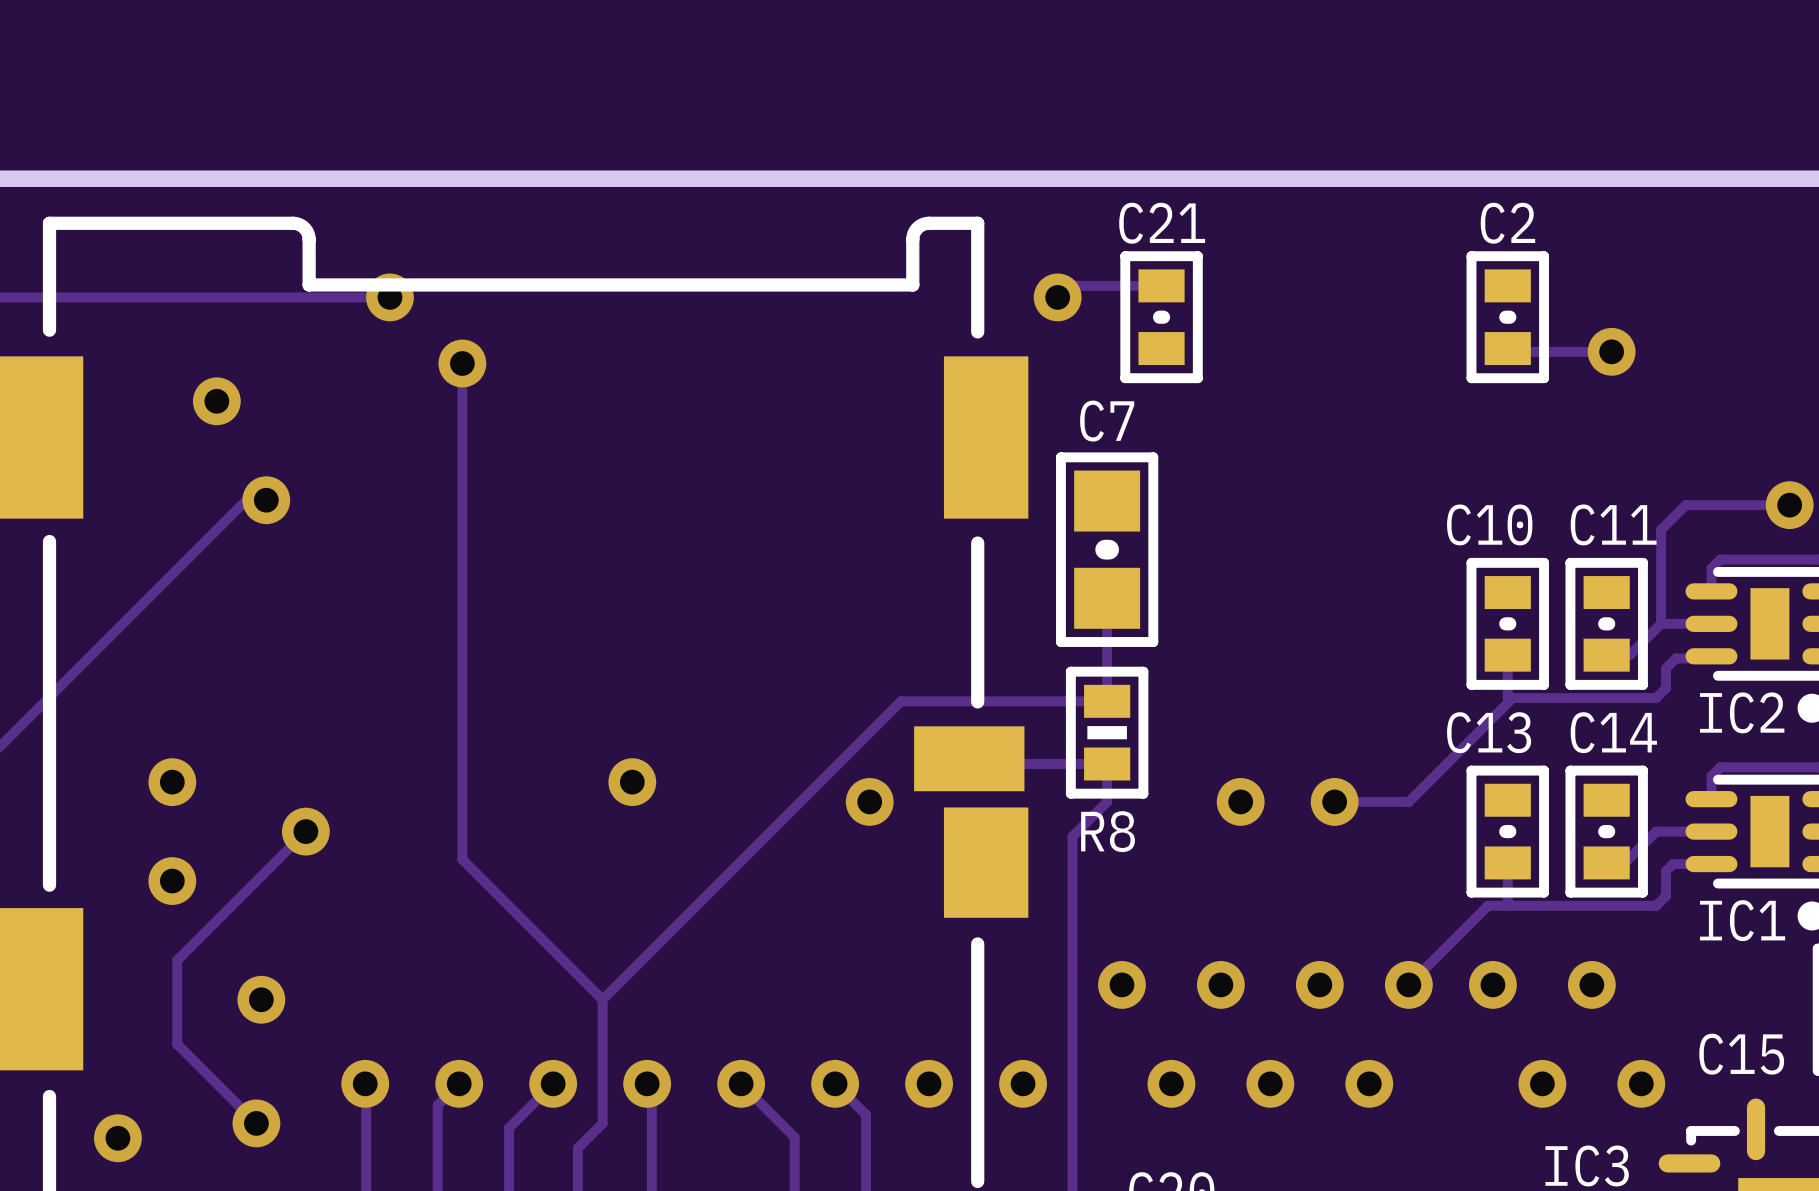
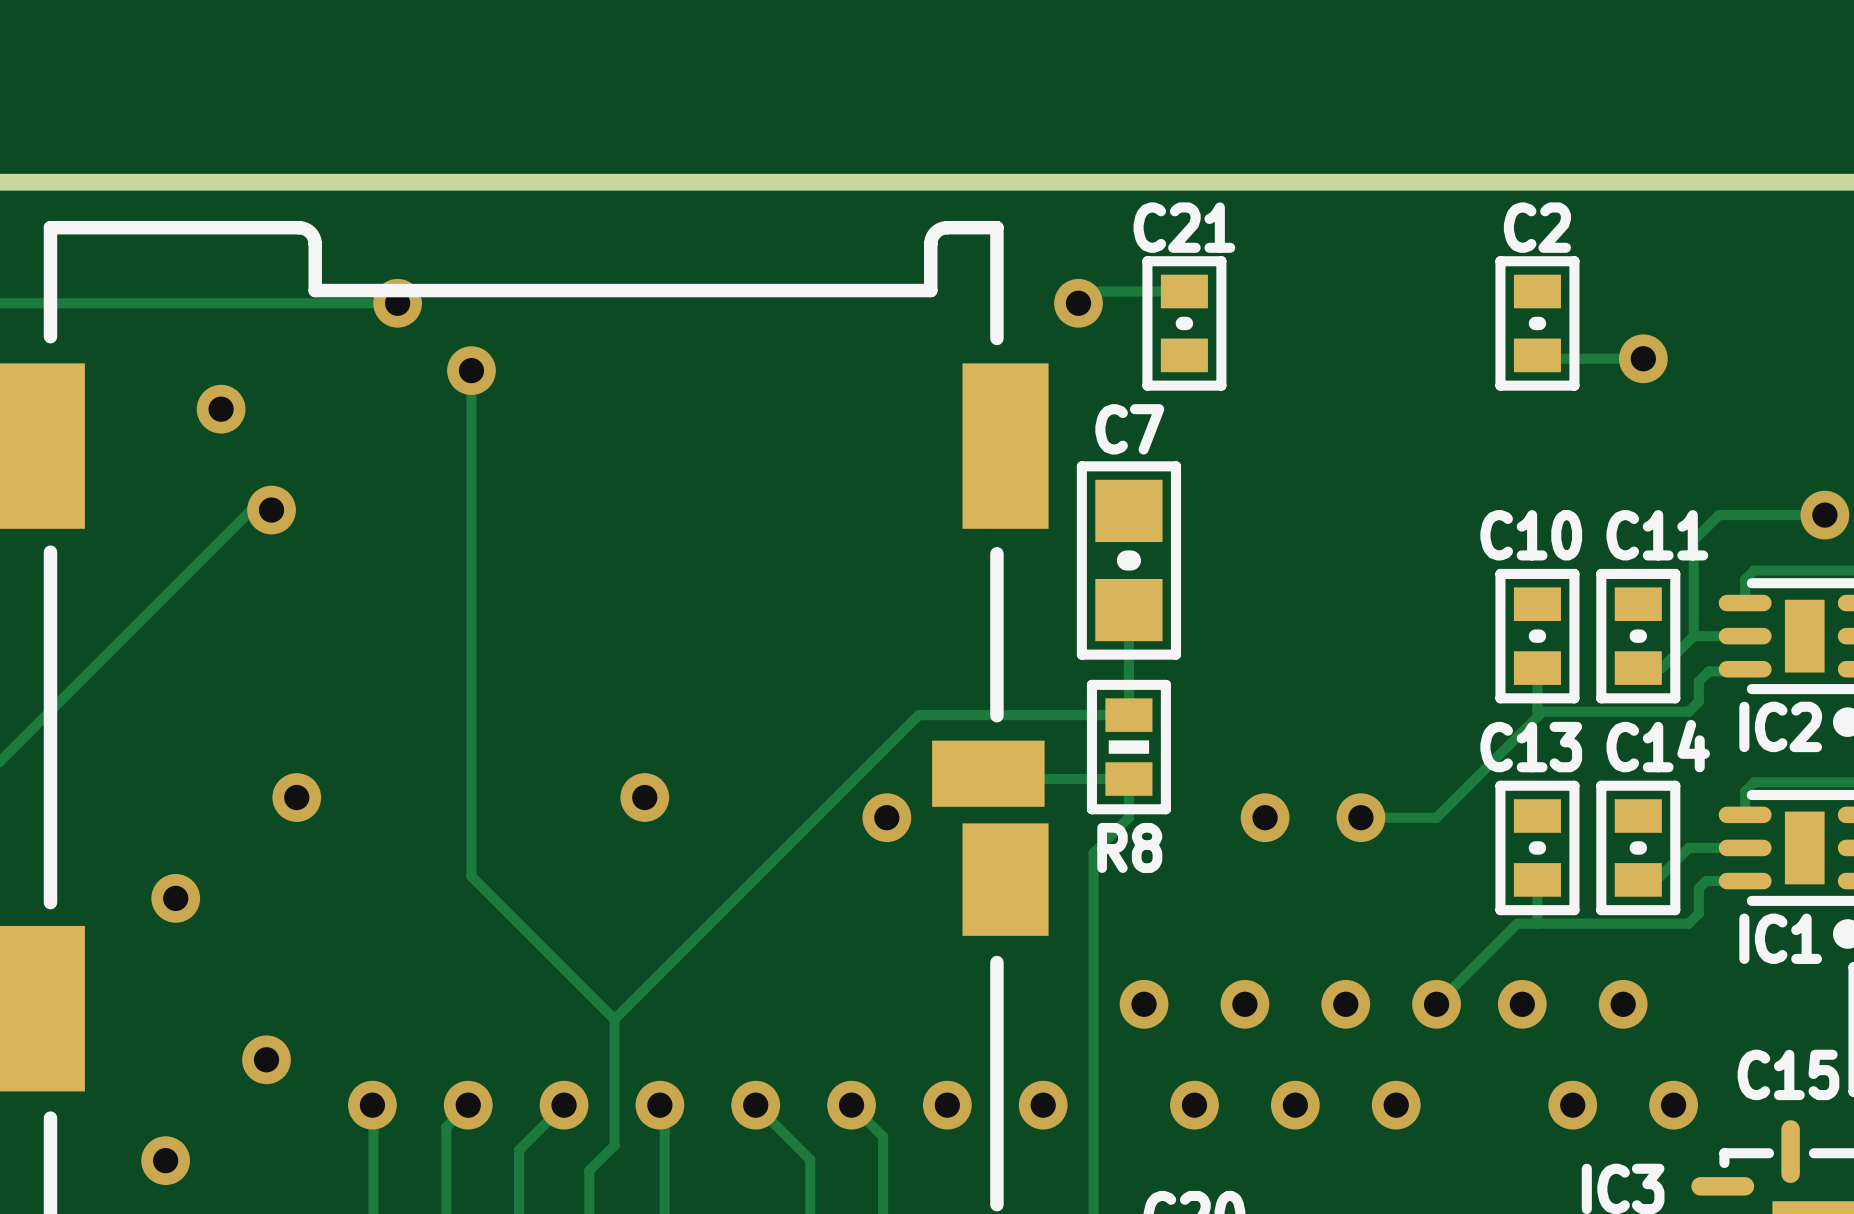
via: (172, 782) -> none
track: (305, 831) (177, 960) (177, 1044) (256, 1123) -> none
via position: (305, 831) -> (296, 797)
via position: (261, 999) -> (266, 1059)
via: (256, 1123) -> none
via position: (117, 1138) -> (165, 1160)

